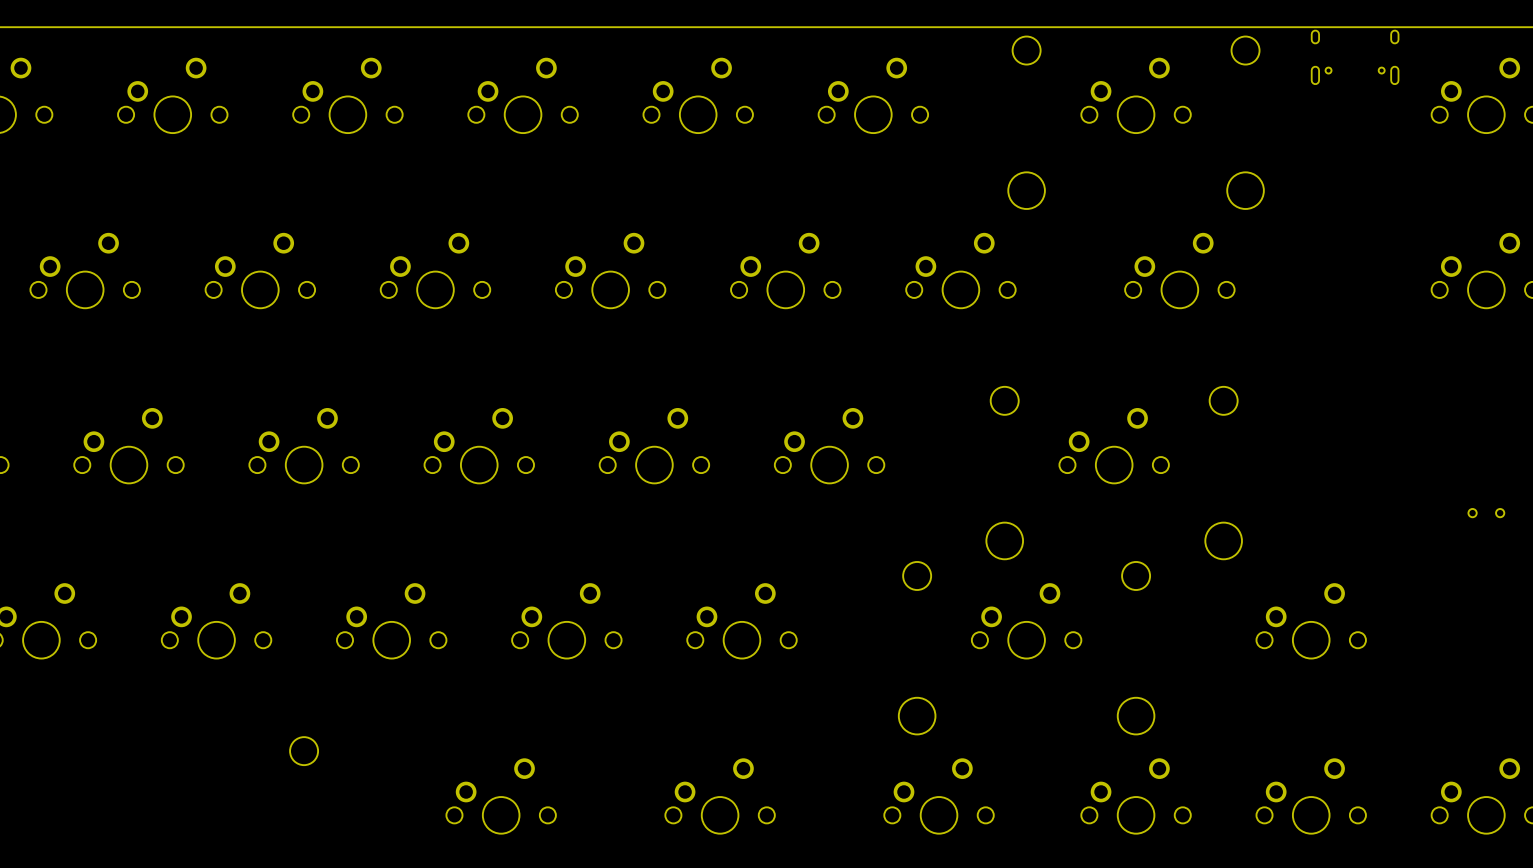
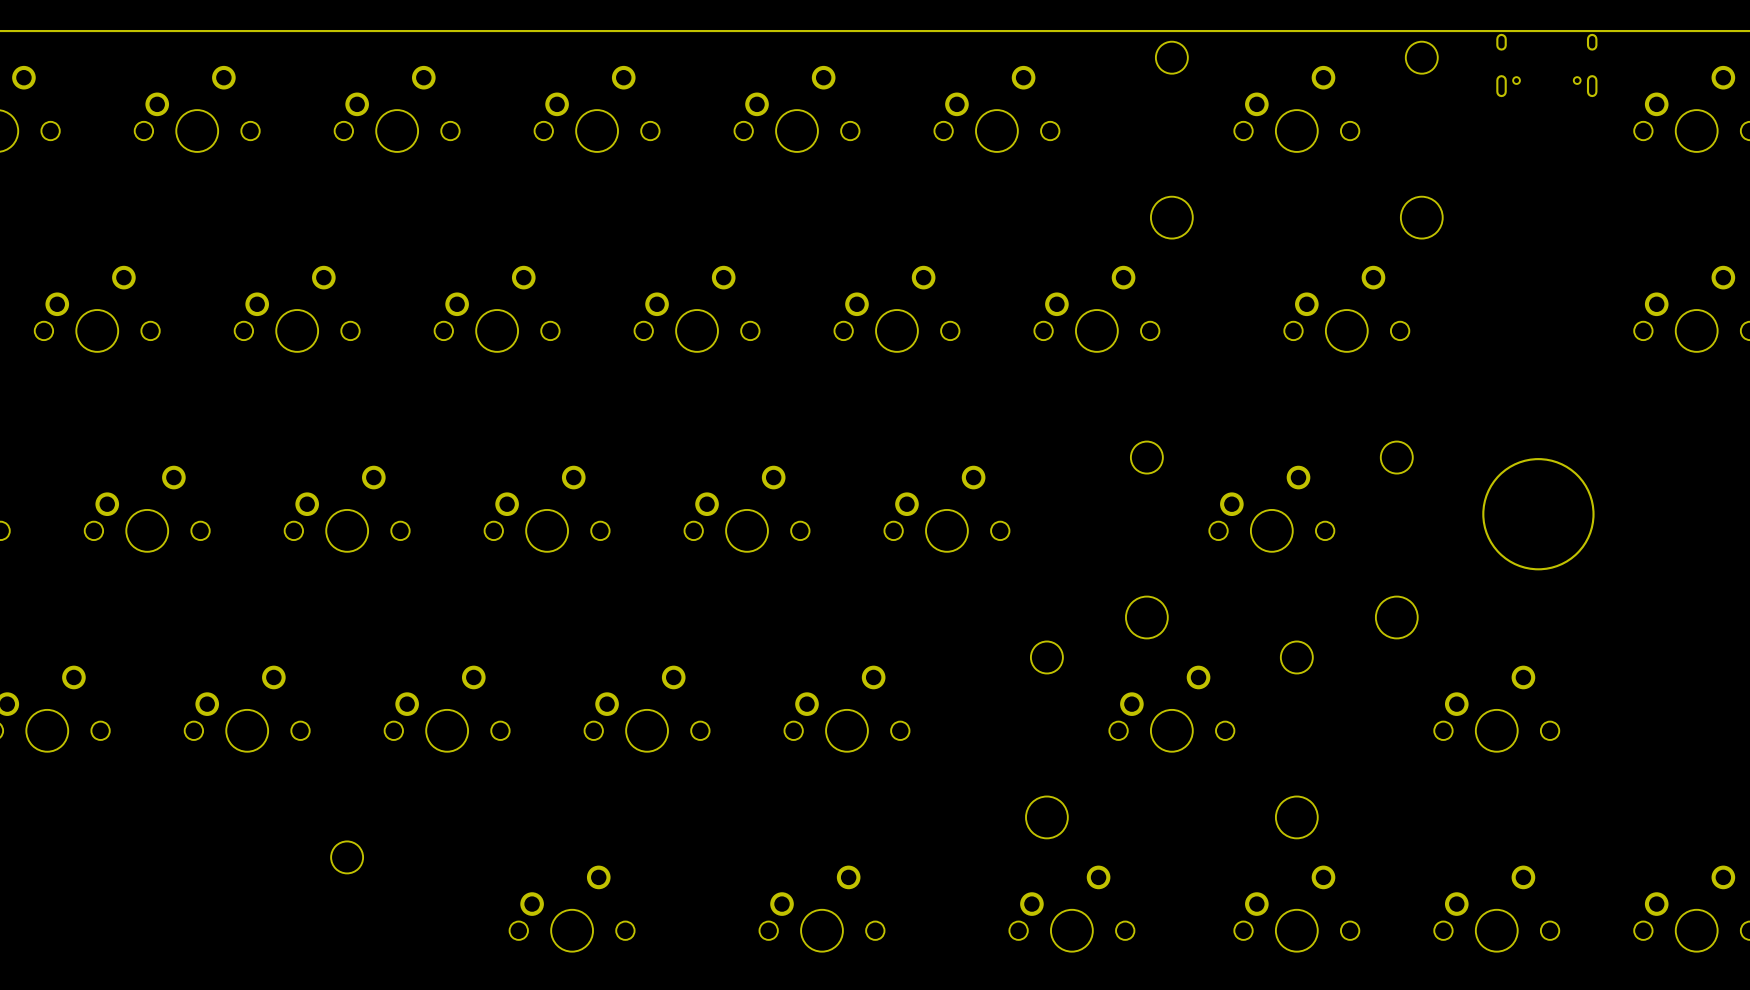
round board edge: none -> [1482, 458, 1595, 571]
part: (1486, 513) -> none

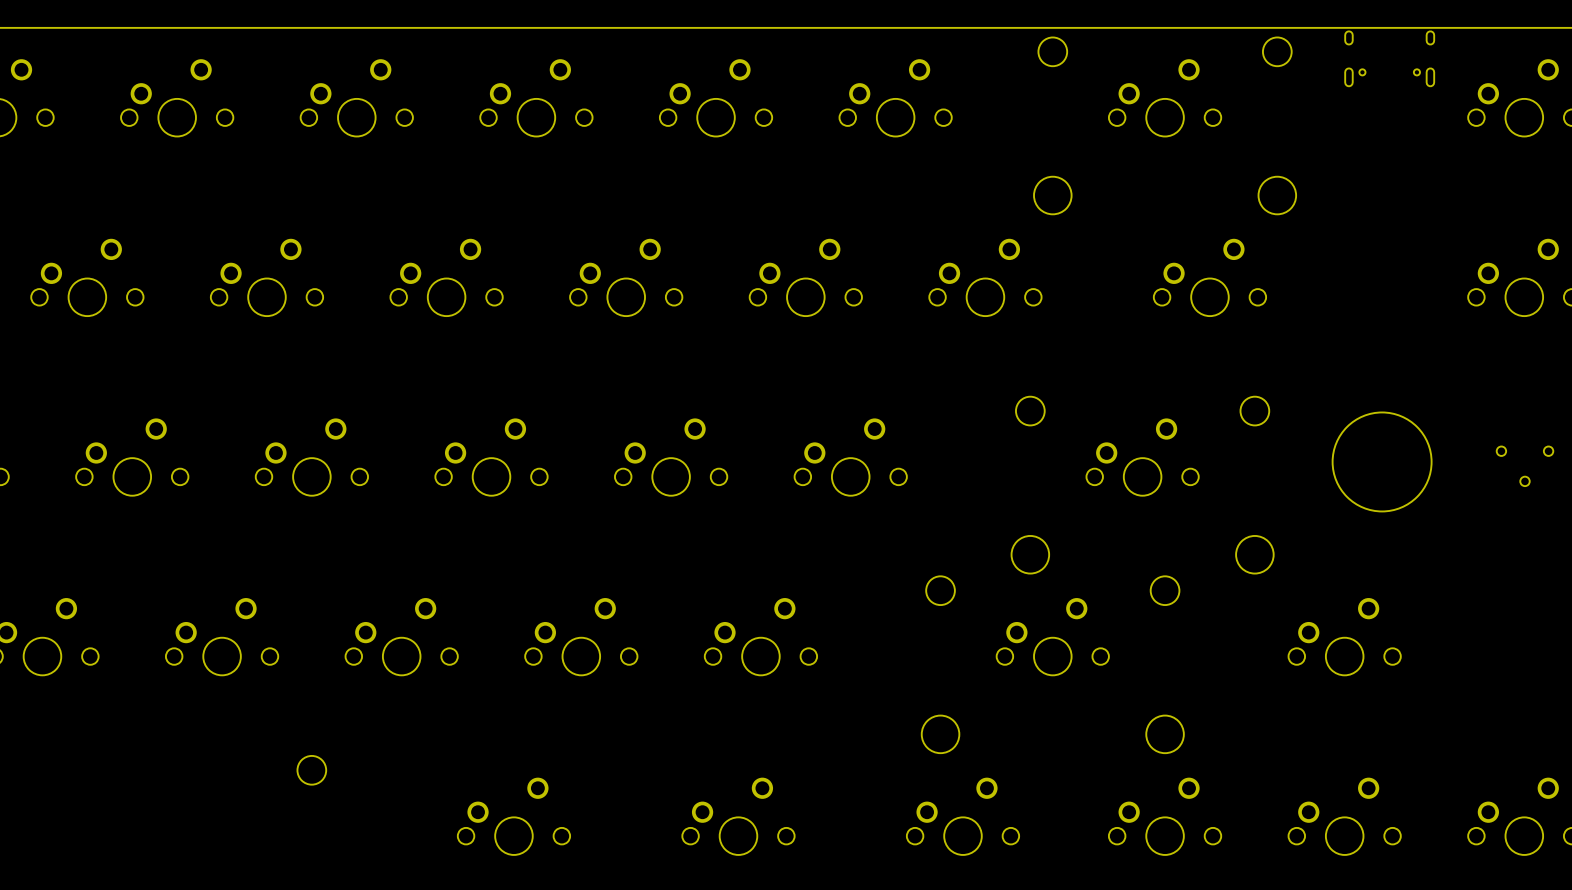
part: none -> (1525, 466)

